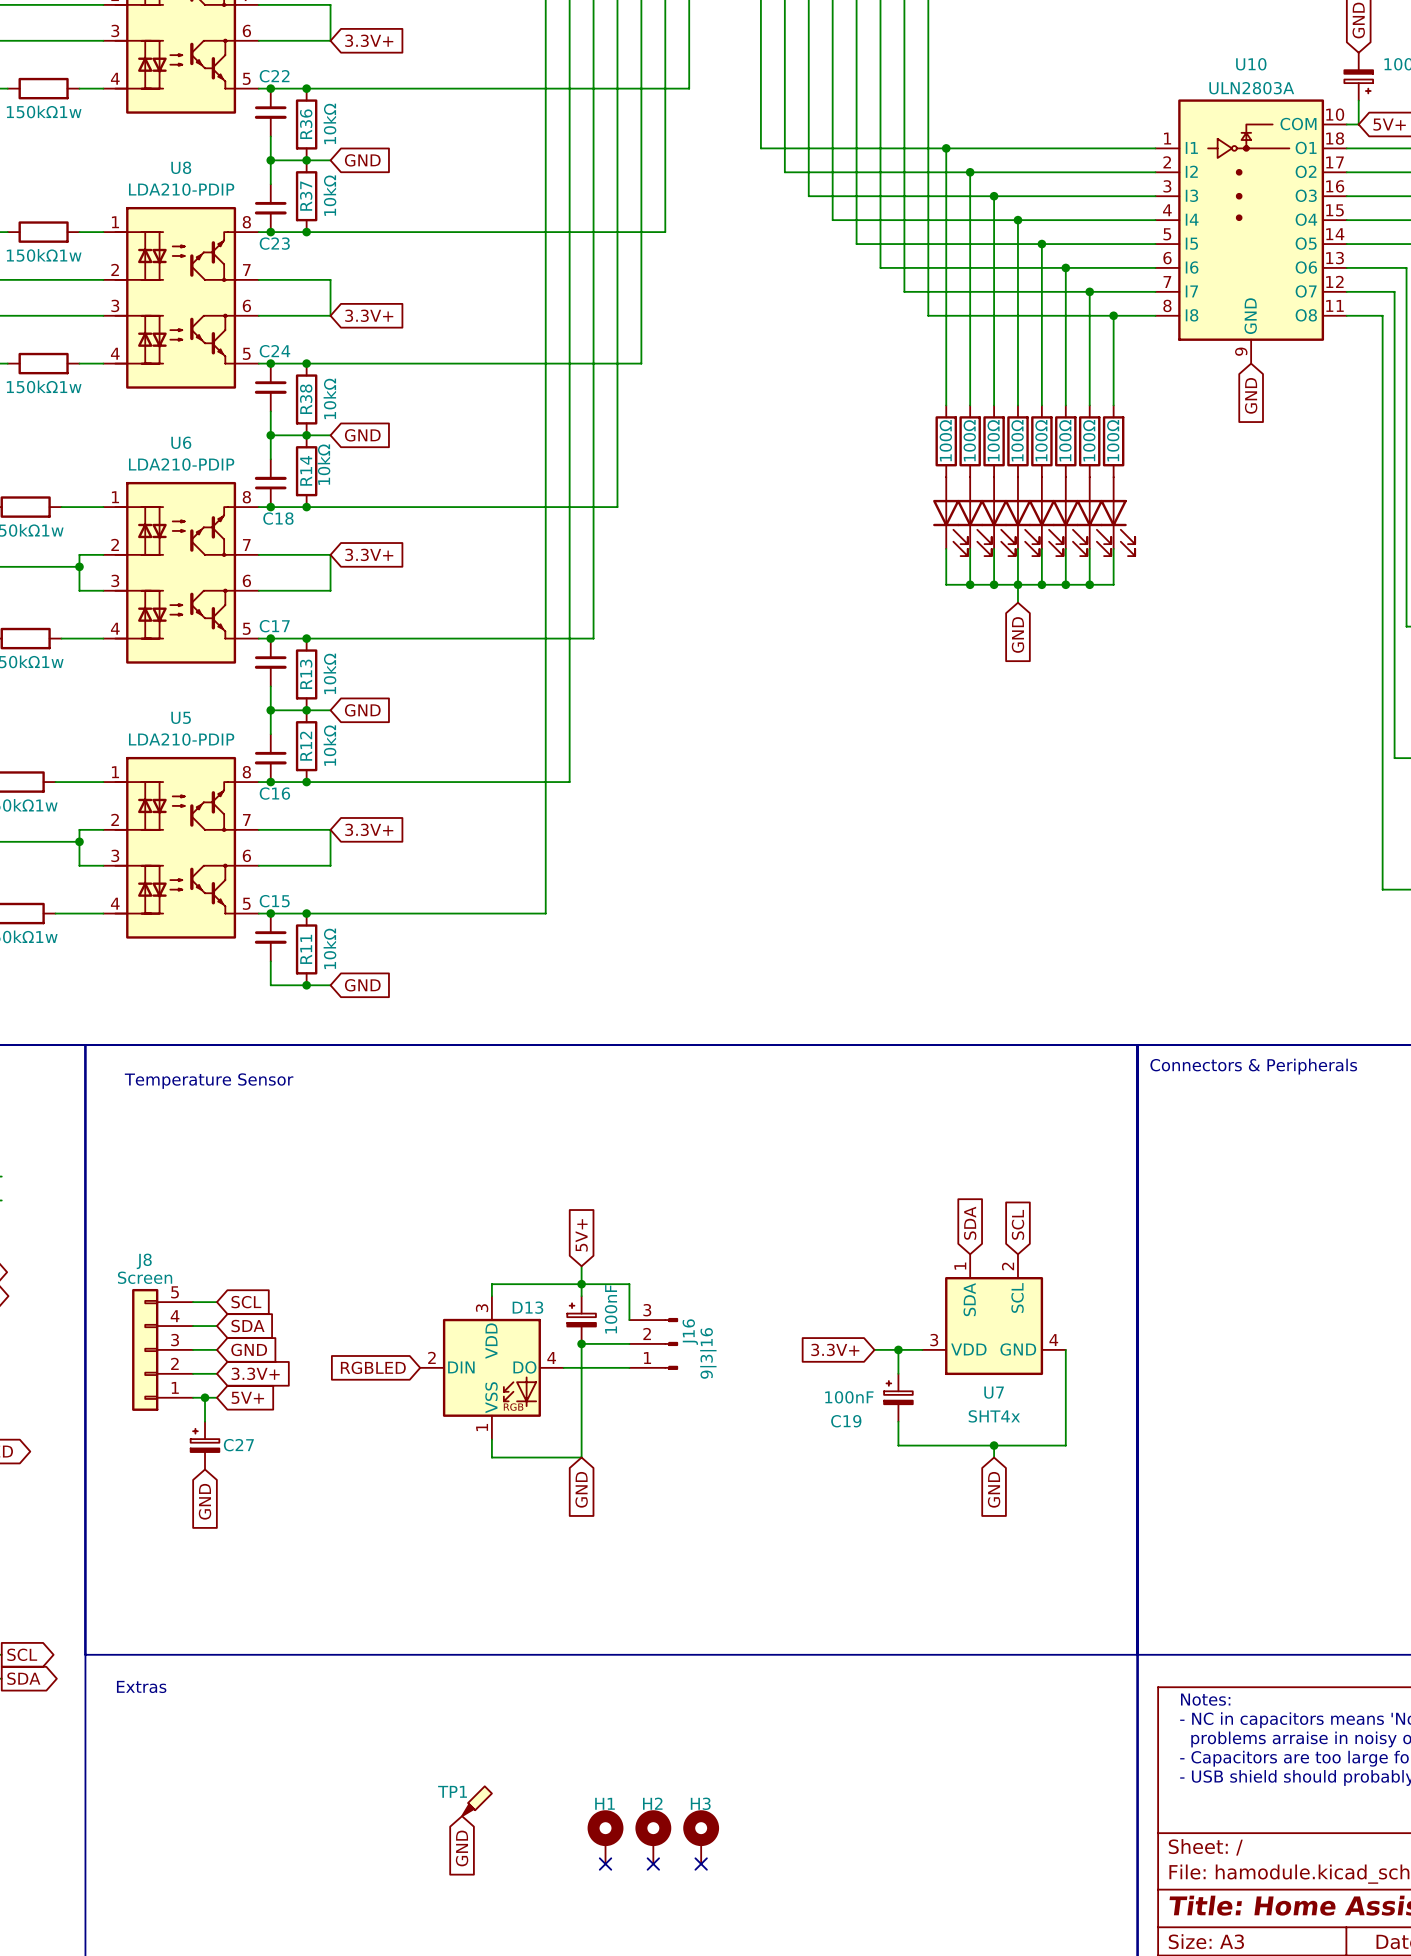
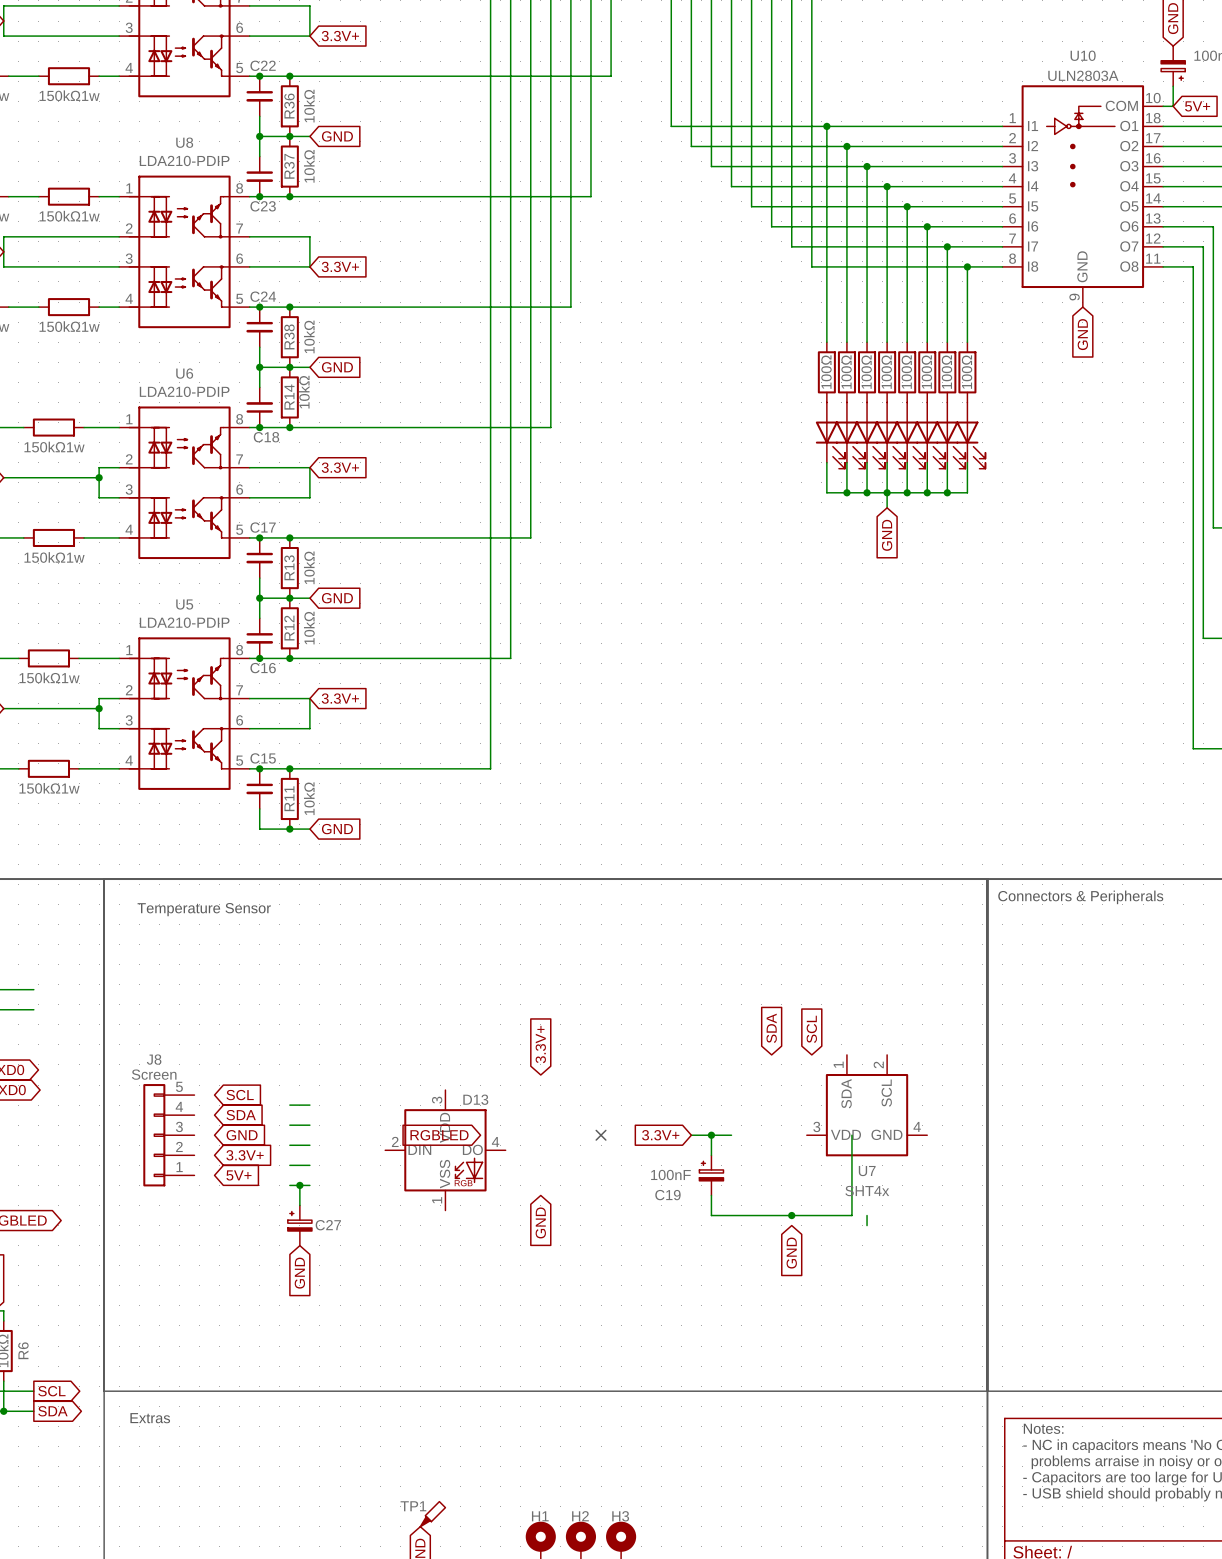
global label position: SDA (970, 1223) -> SDA (771, 1028)
global label position: SCL (1017, 1224) -> SCL (811, 1029)
global label: 5V+ (581, 1235) -> none
global label: none -> 3.3V+ (540, 1044)
wire: (581, 1266) (581, 1296) -> none
junction: (581, 1284) -> none
wire: (491, 1296) (491, 1284) (629, 1284) (629, 1320) -> none
wire: (193, 1302) (216, 1302) -> (289, 1105) (309, 1105)
part: 100nF (581, 1320) -> none
wire: (193, 1326) (216, 1326) -> (289, 1125) (309, 1125)
junction: (581, 1343) -> none
wire: (629, 1343) (581, 1343) (581, 1457) (491, 1457) (491, 1439) -> none
J16: 9|3|16 (653, 1343) -> none
wire: (193, 1349) (216, 1349) -> (289, 1145) (309, 1145)
no-connect mark: none -> (601, 1135)
junction: none -> (711, 1135)
global label position: 3.3V+ (835, 1349) -> 3.3V+ (660, 1135)
wire: (874, 1349) (922, 1349) -> (691, 1135) (731, 1135)
wire: (898, 1349) (898, 1373) -> (711, 1135) (711, 1155)
junction: (898, 1349) -> none
wire: (1065, 1349) (1065, 1445) (976, 1445) -> (851, 1135) (851, 1215)
global label position: RGBLED (373, 1367) -> RGBLED (439, 1135)
wire: (563, 1367) (629, 1367) -> none
wire: (193, 1373) (216, 1373) -> (289, 1165) (309, 1165)
wire: (193, 1397) (216, 1397) -> (289, 1185) (309, 1185)
wire: (205, 1397) (205, 1421) -> (299, 1185) (299, 1205)
junction: (205, 1397) -> none
C19 position: (898, 1397) -> (711, 1175)
junction: none -> (299, 1185)
wire: (898, 1421) (898, 1445) -> (711, 1195) (711, 1215) (786, 1215)
C27 position: (205, 1445) -> (299, 1225)
junction: none -> (791, 1215)
junction: (994, 1445) -> none
global label position: GND (581, 1489) -> GND (540, 1222)
global label position: GND (994, 1489) -> GND (791, 1253)
global label position: GND (205, 1501) -> GND (299, 1273)

